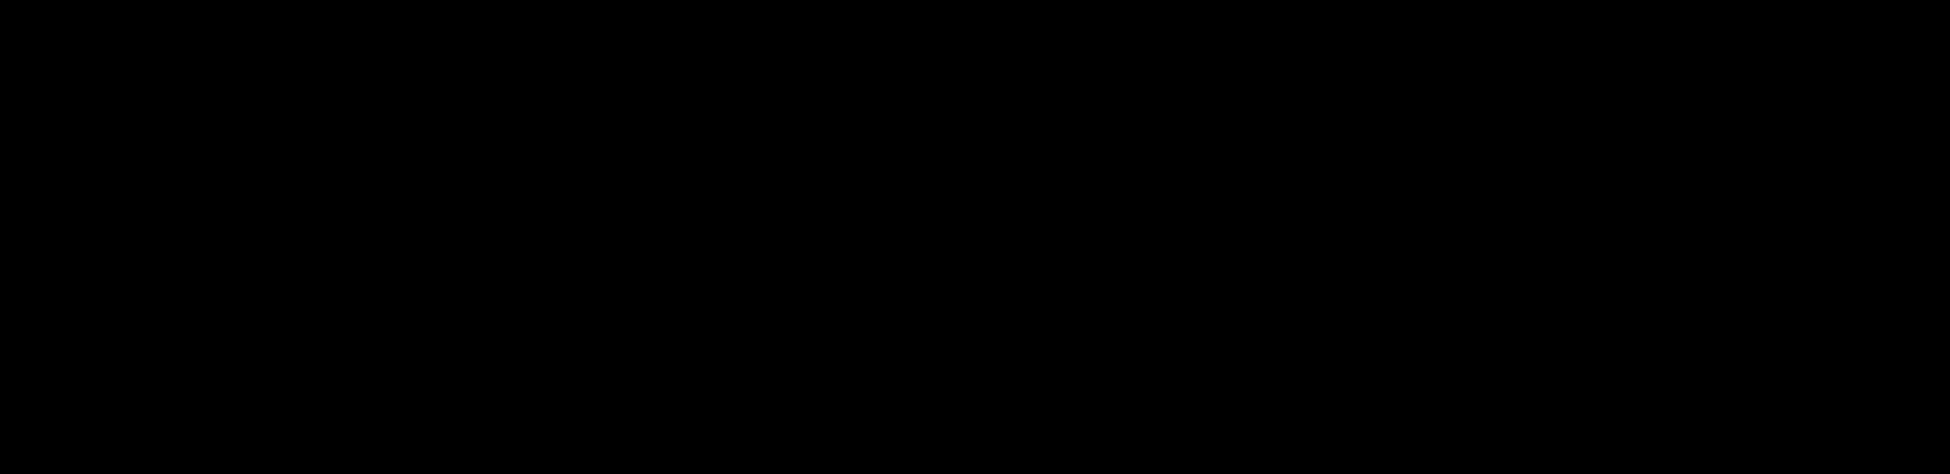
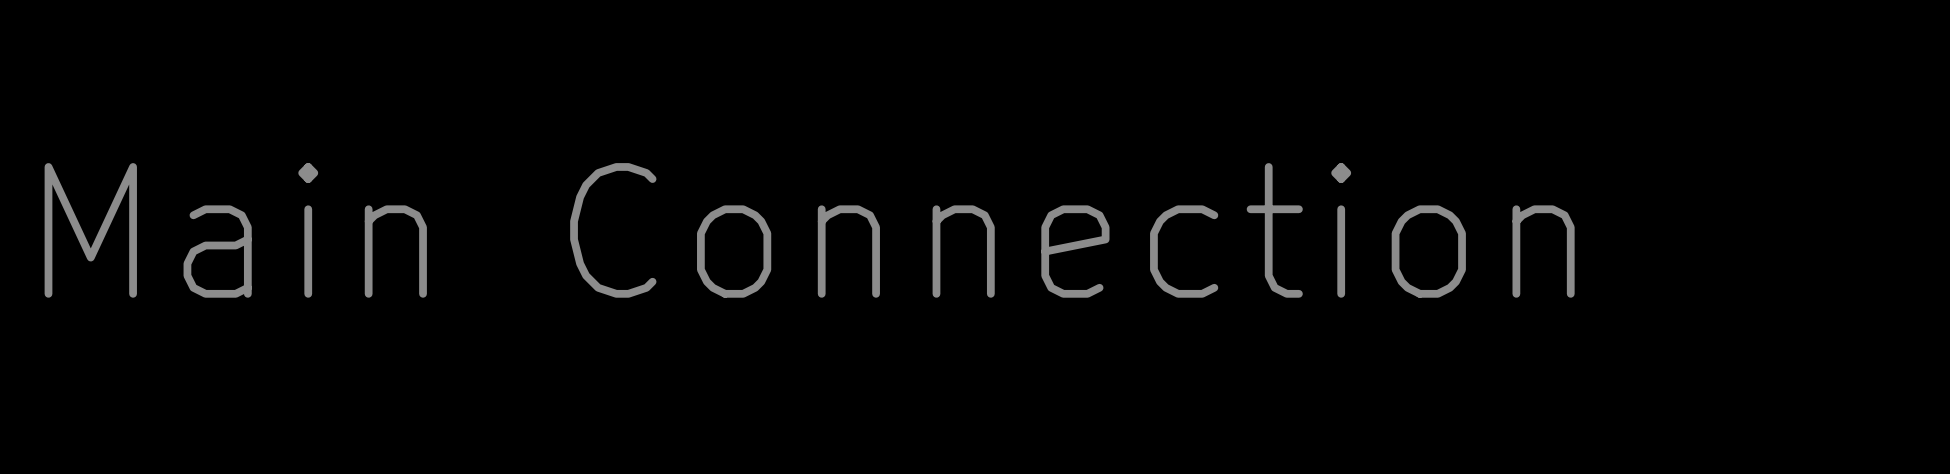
text: none -> Main Connection (809, 230)

